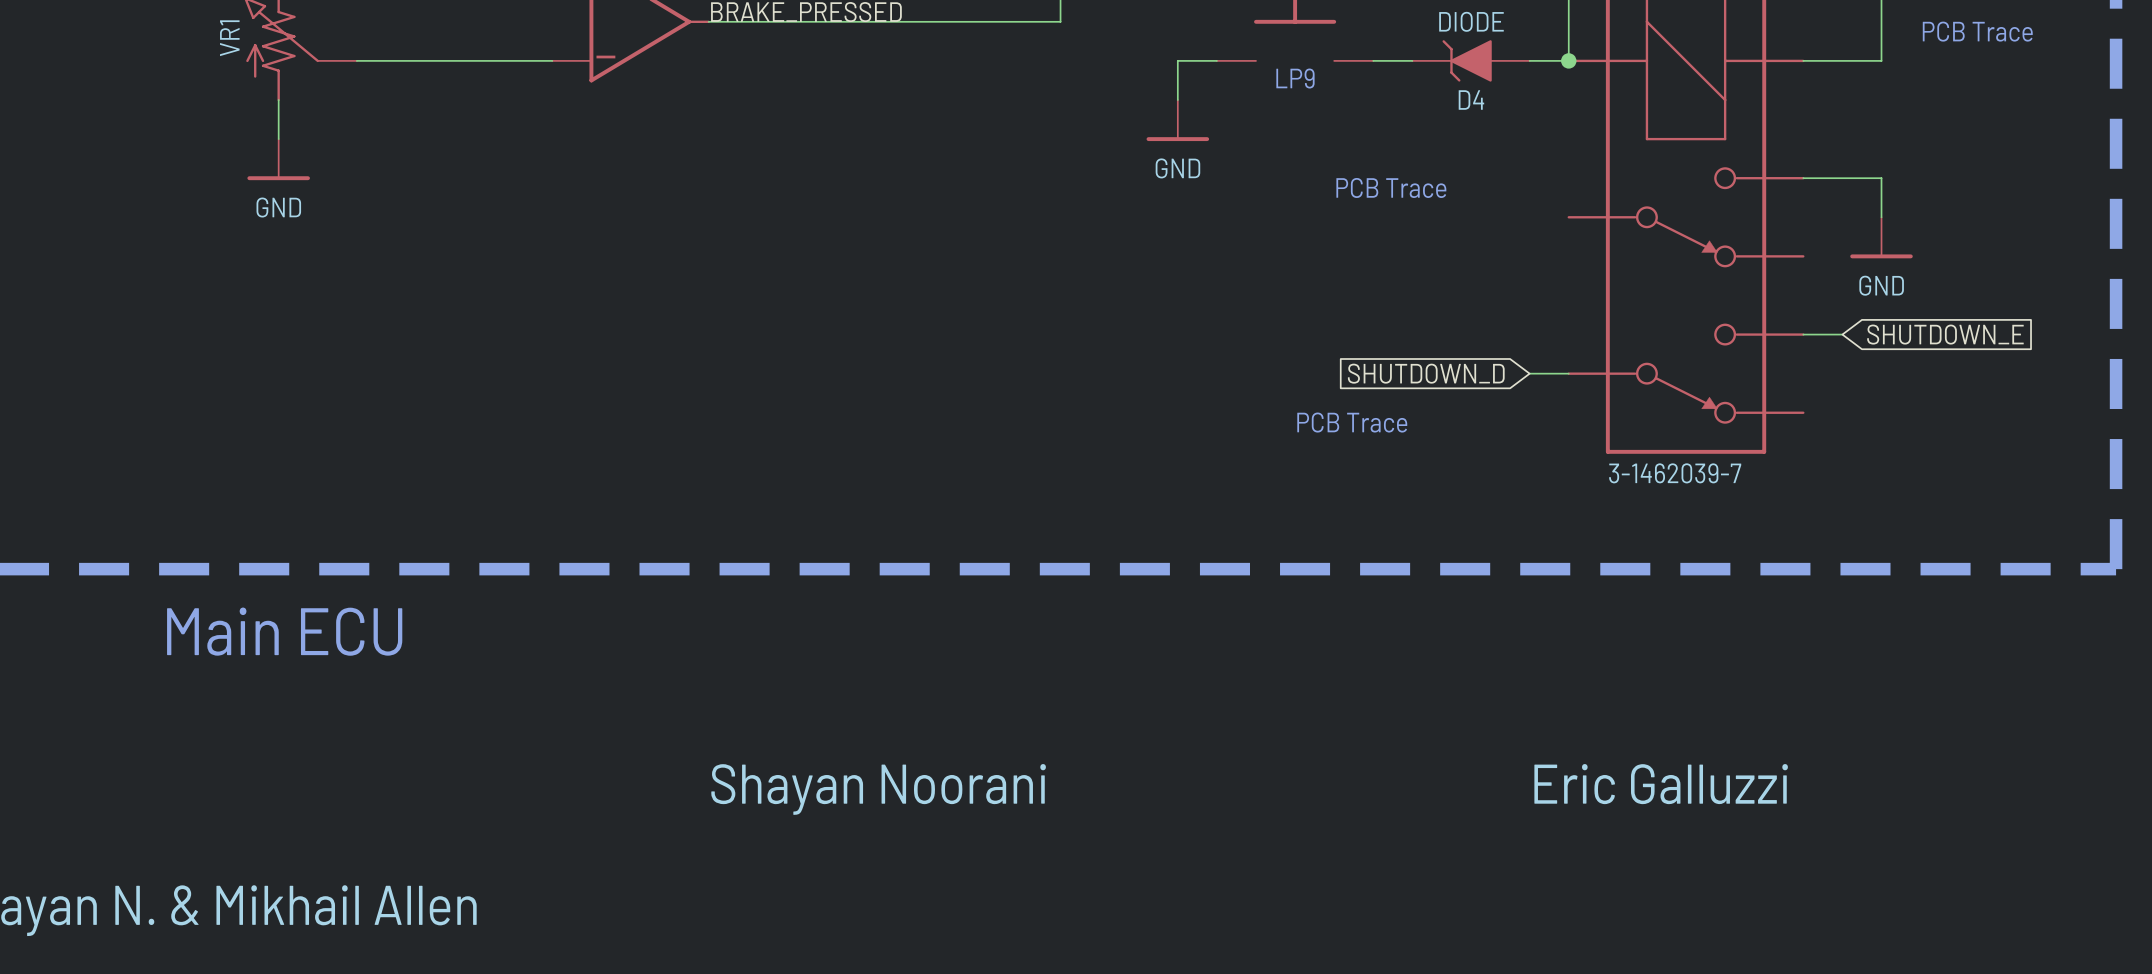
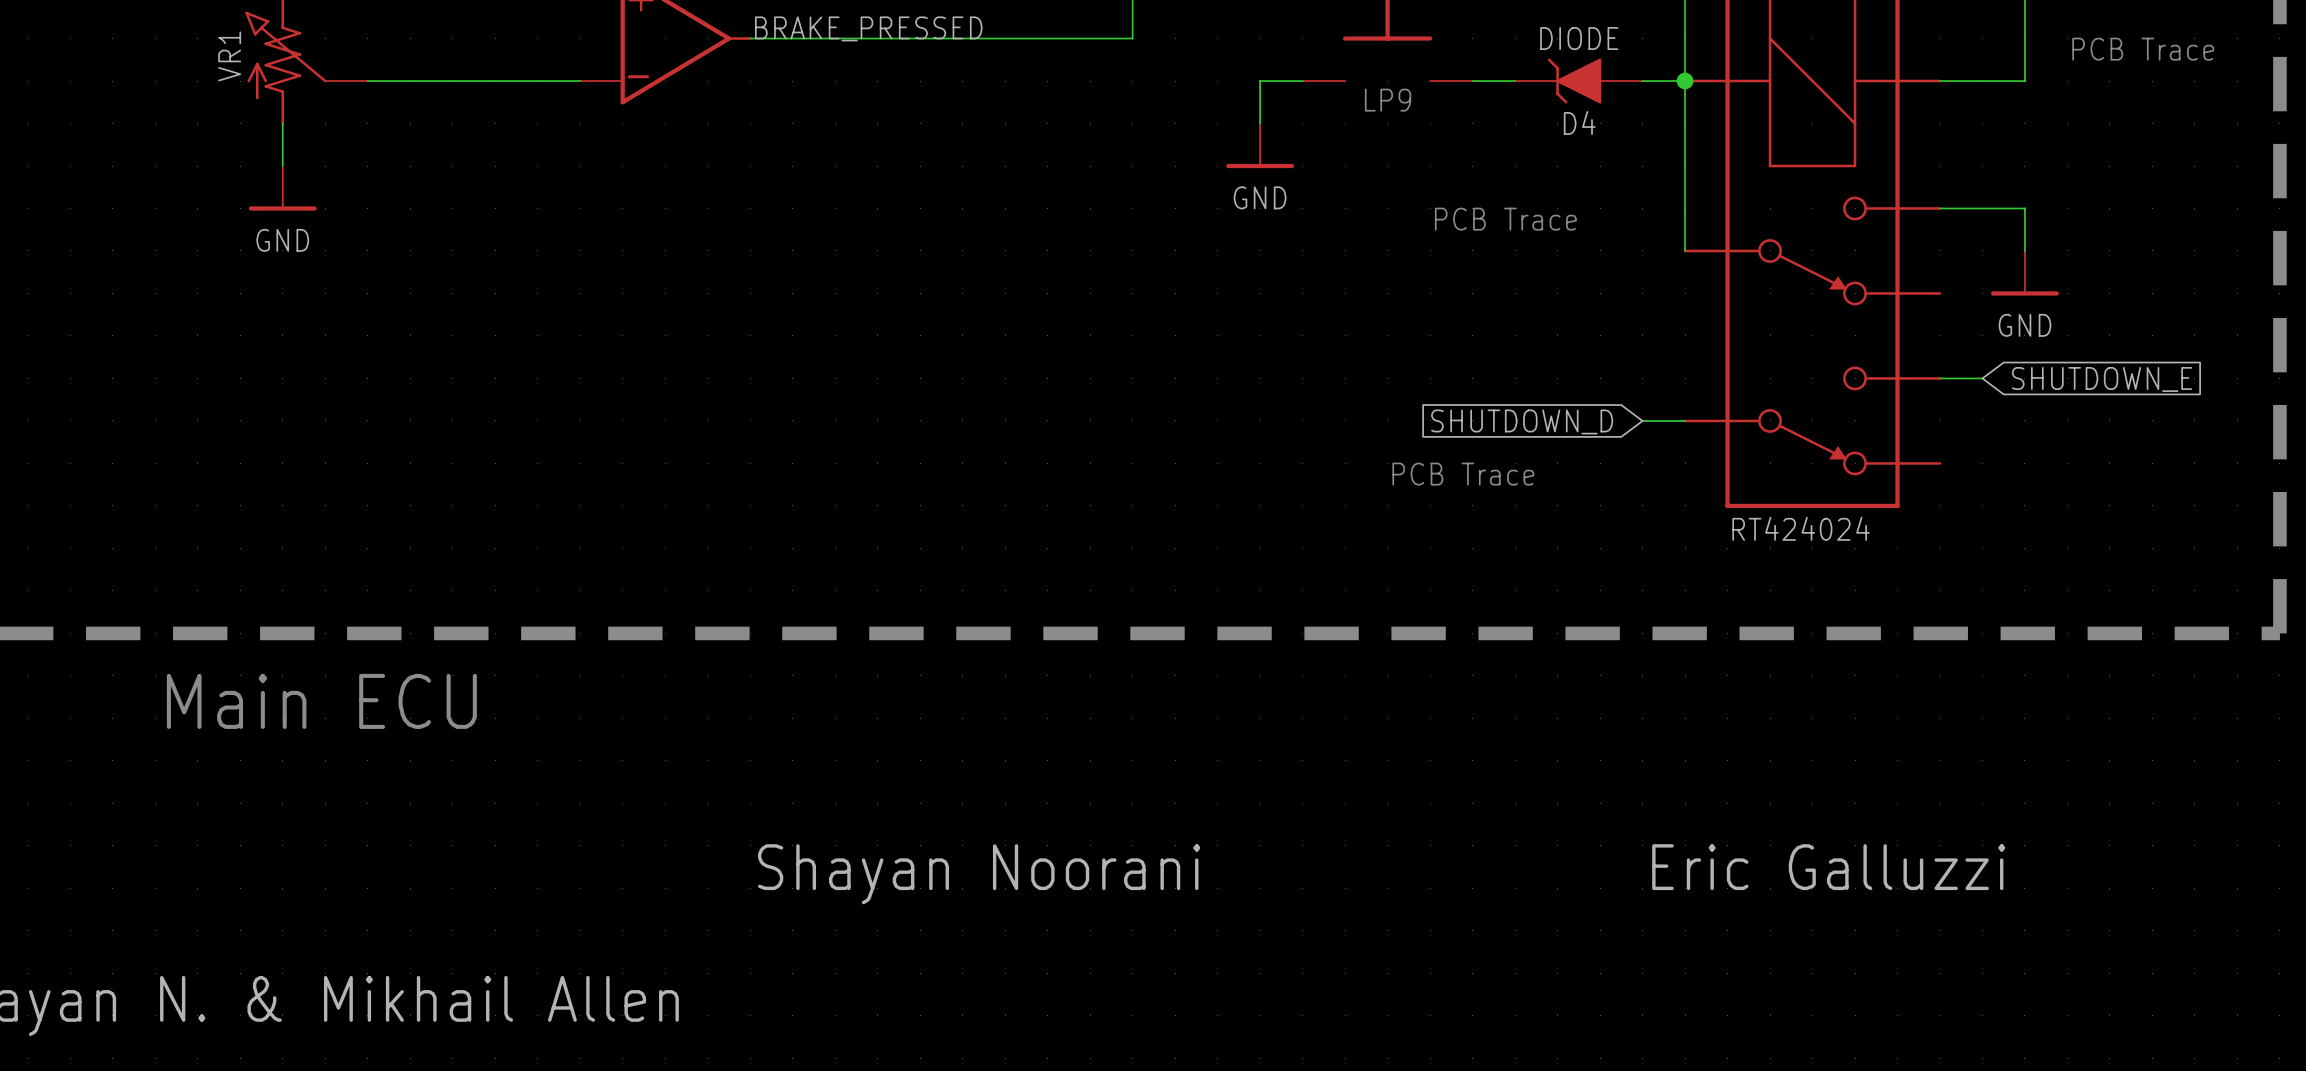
wire: none -> (1685, 81) (1685, 250)
part text: 3-1462039-7 (1675, 473) -> RT424024 (1801, 528)

